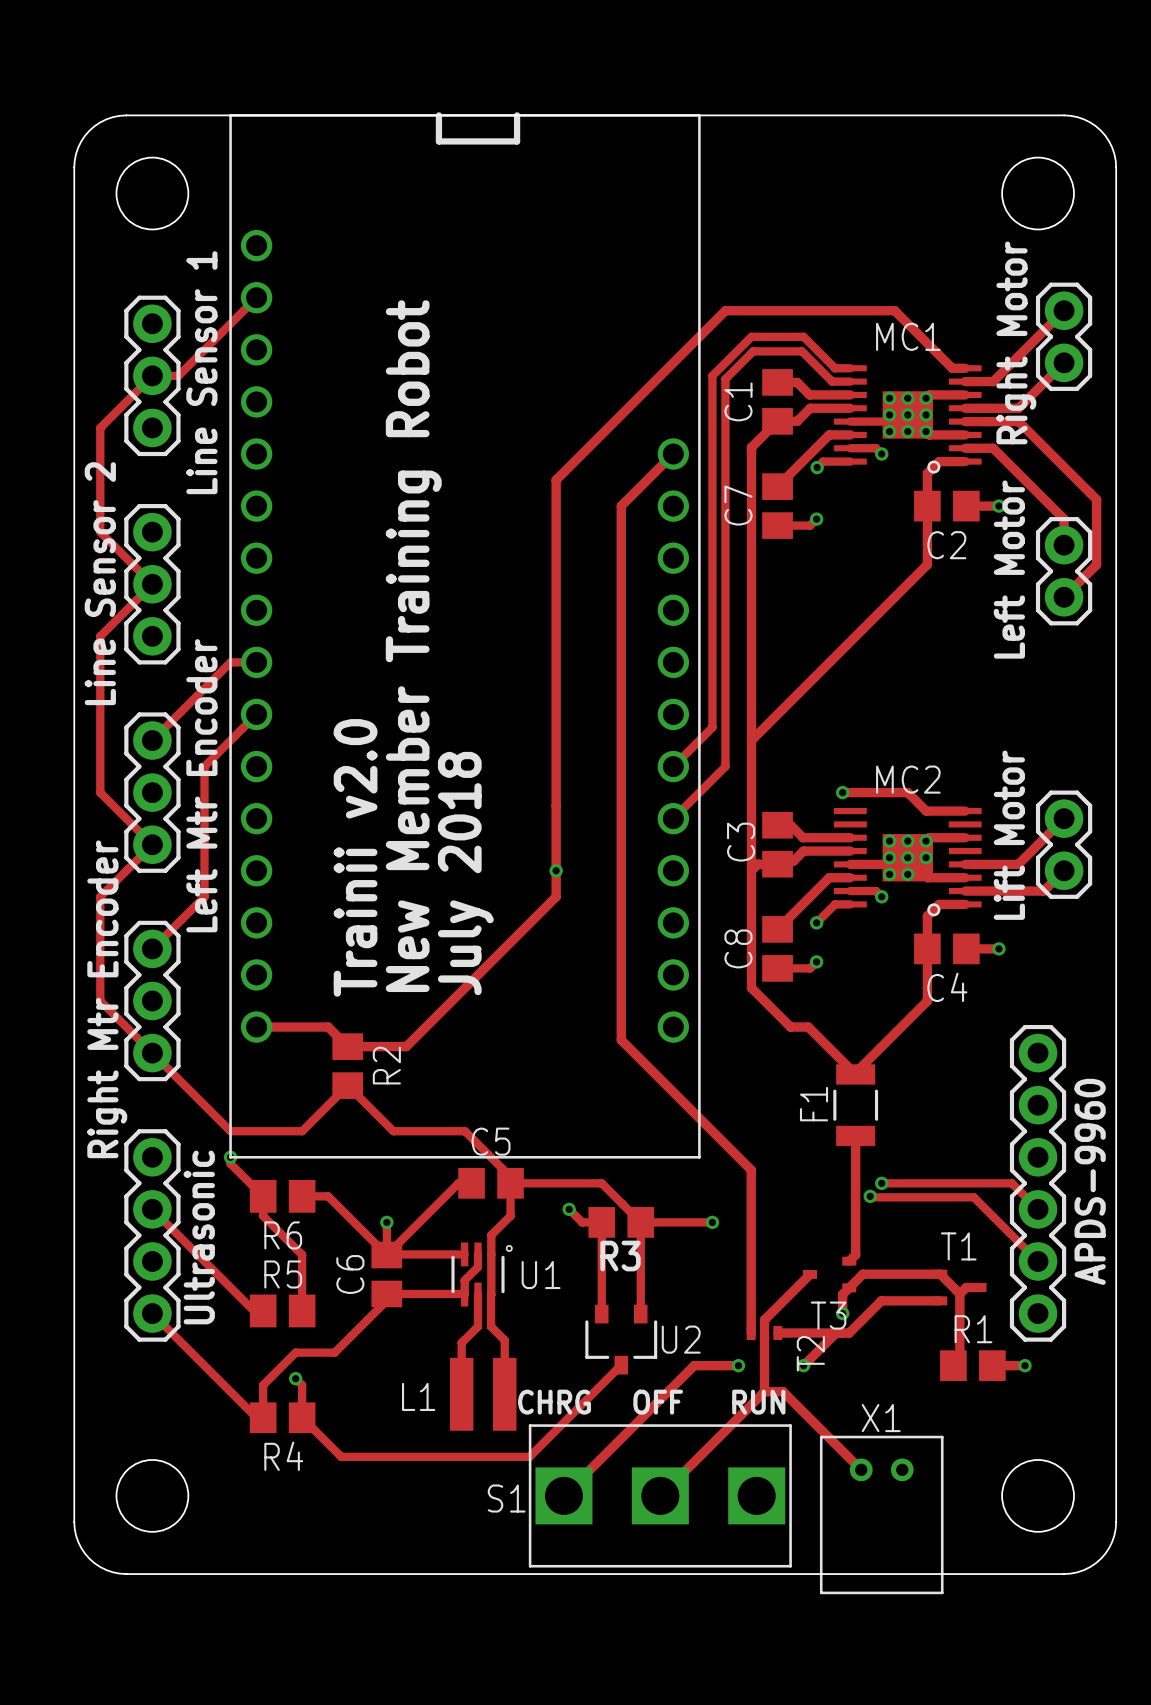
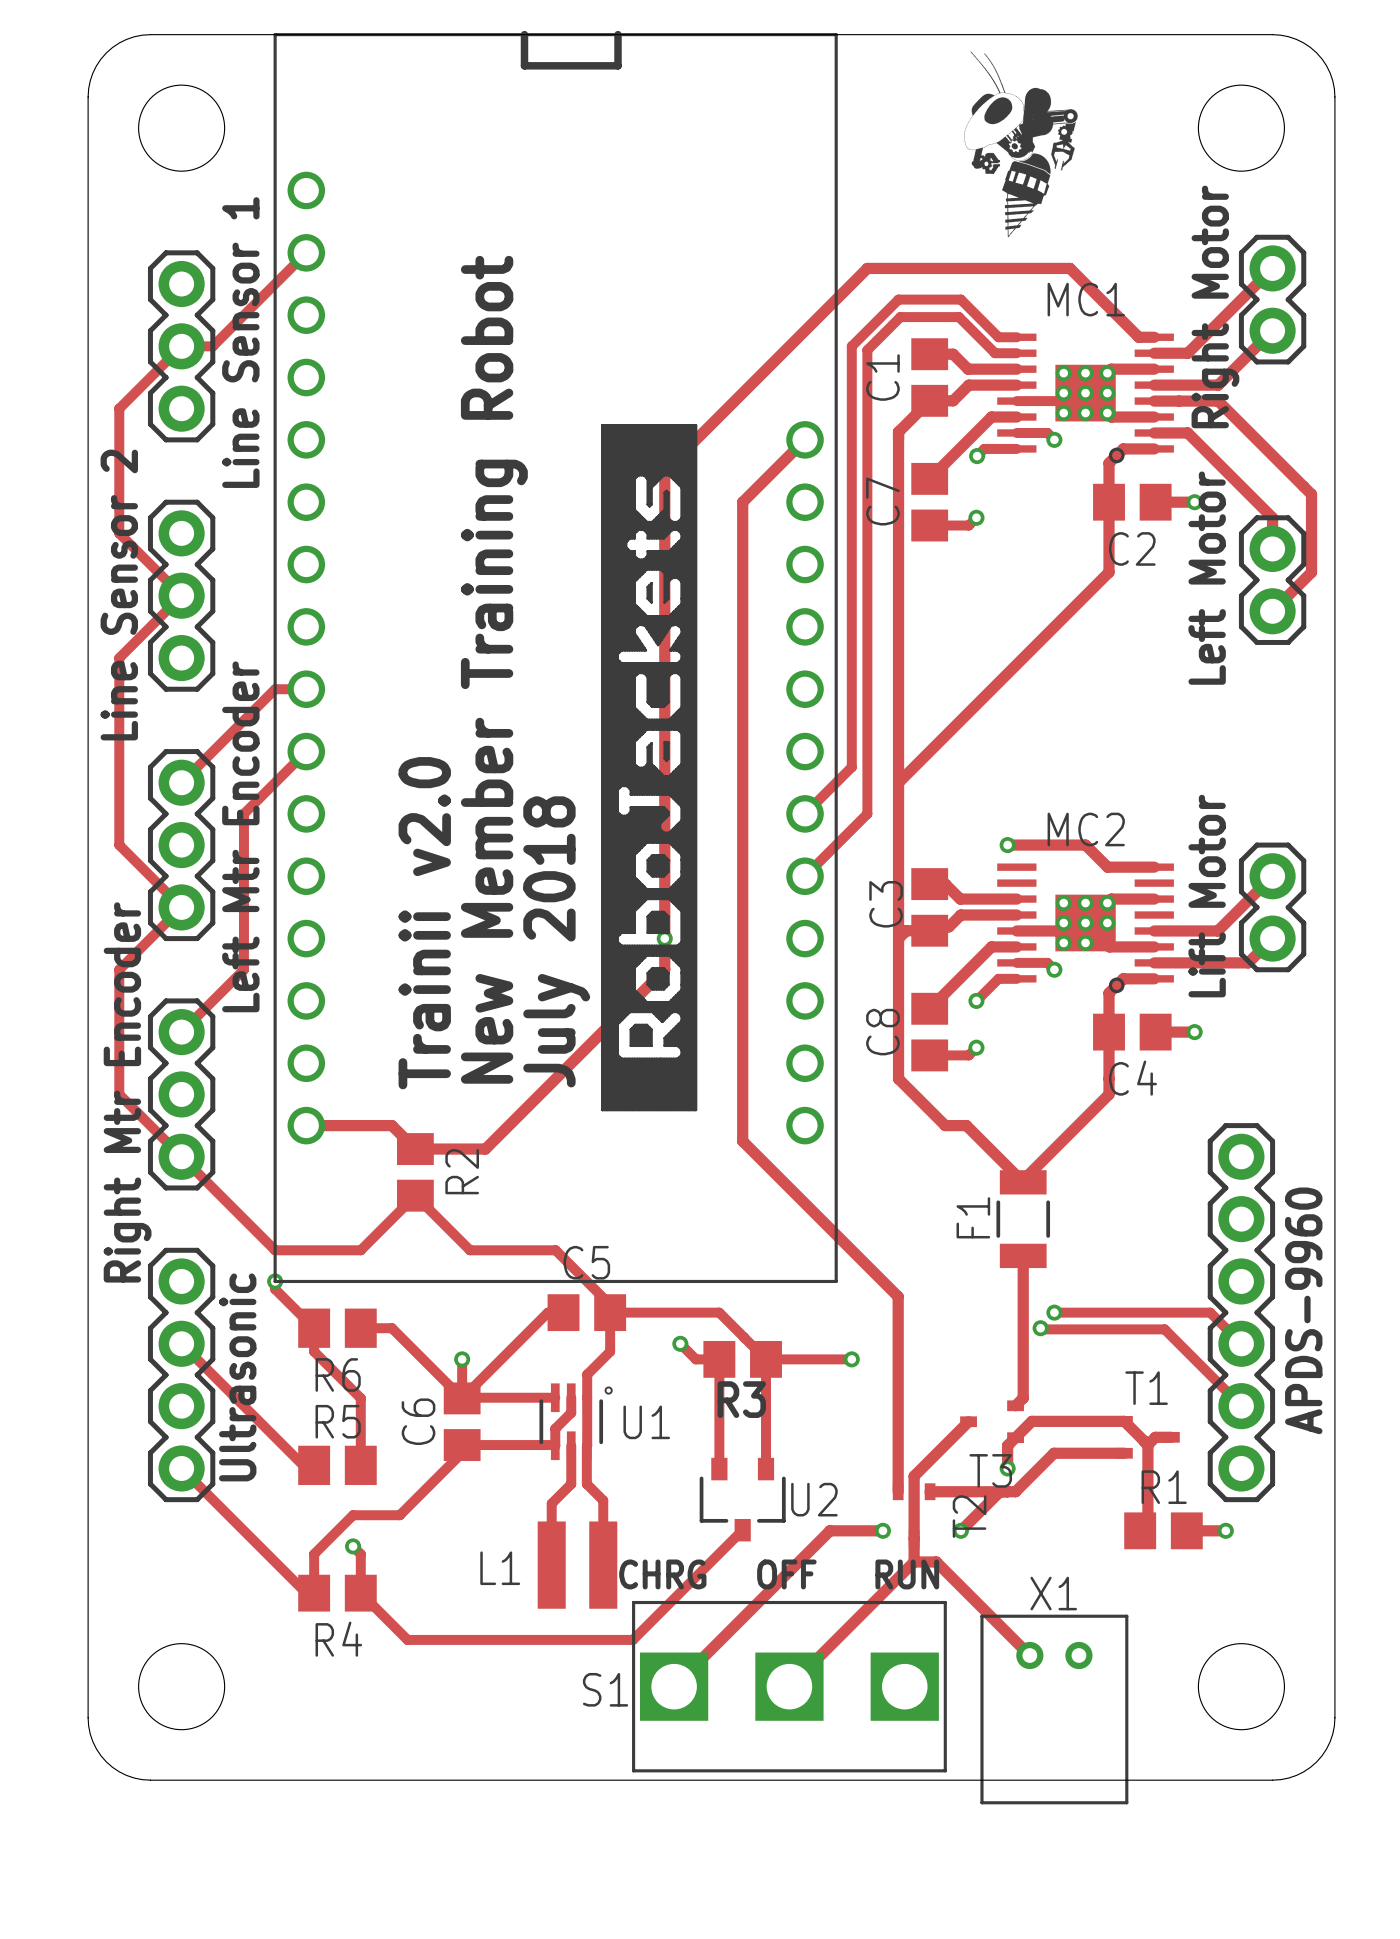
drawing: none -> [964, 51, 1078, 238]
drawing: none -> [601, 424, 698, 1112]

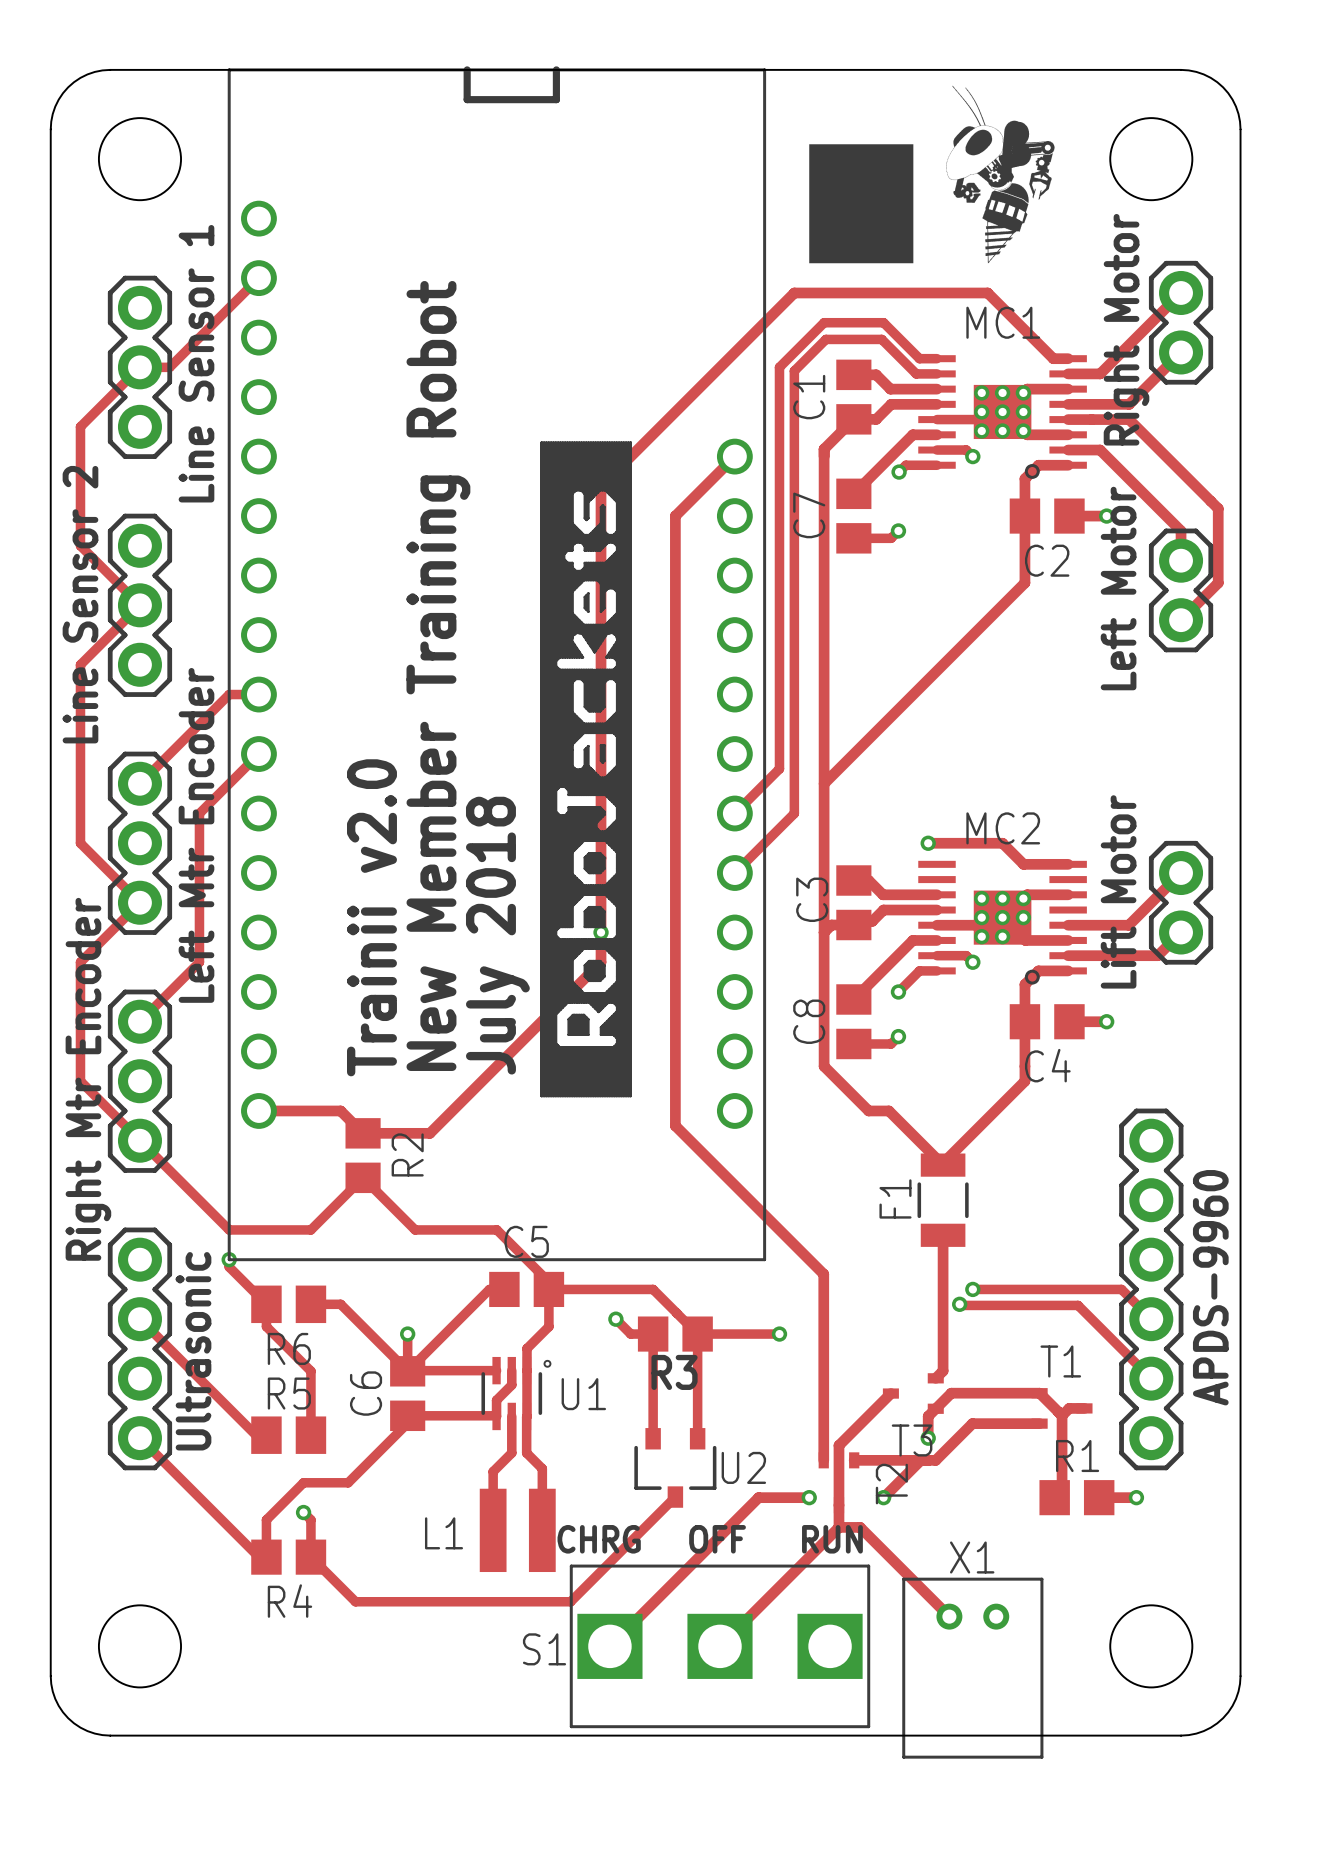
drawing: none -> [809, 144, 914, 264]
drawing position: (1020, 144) -> (1000, 174)

